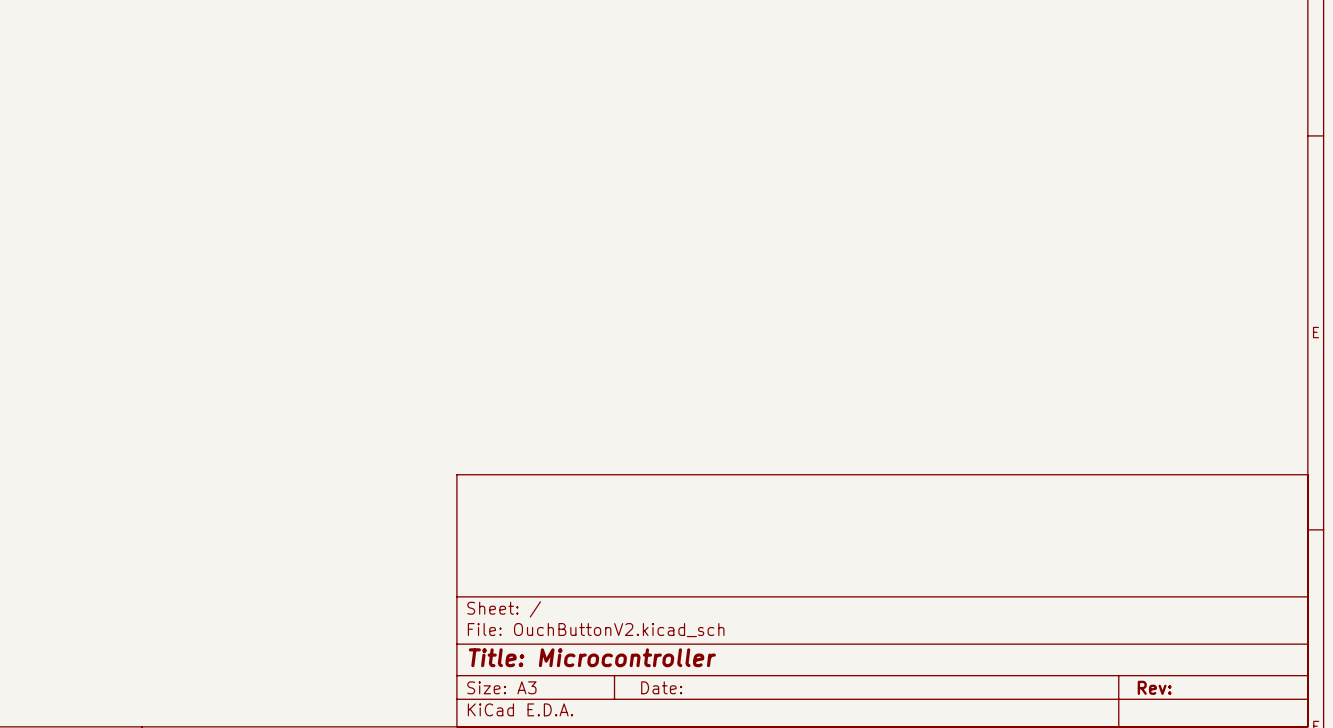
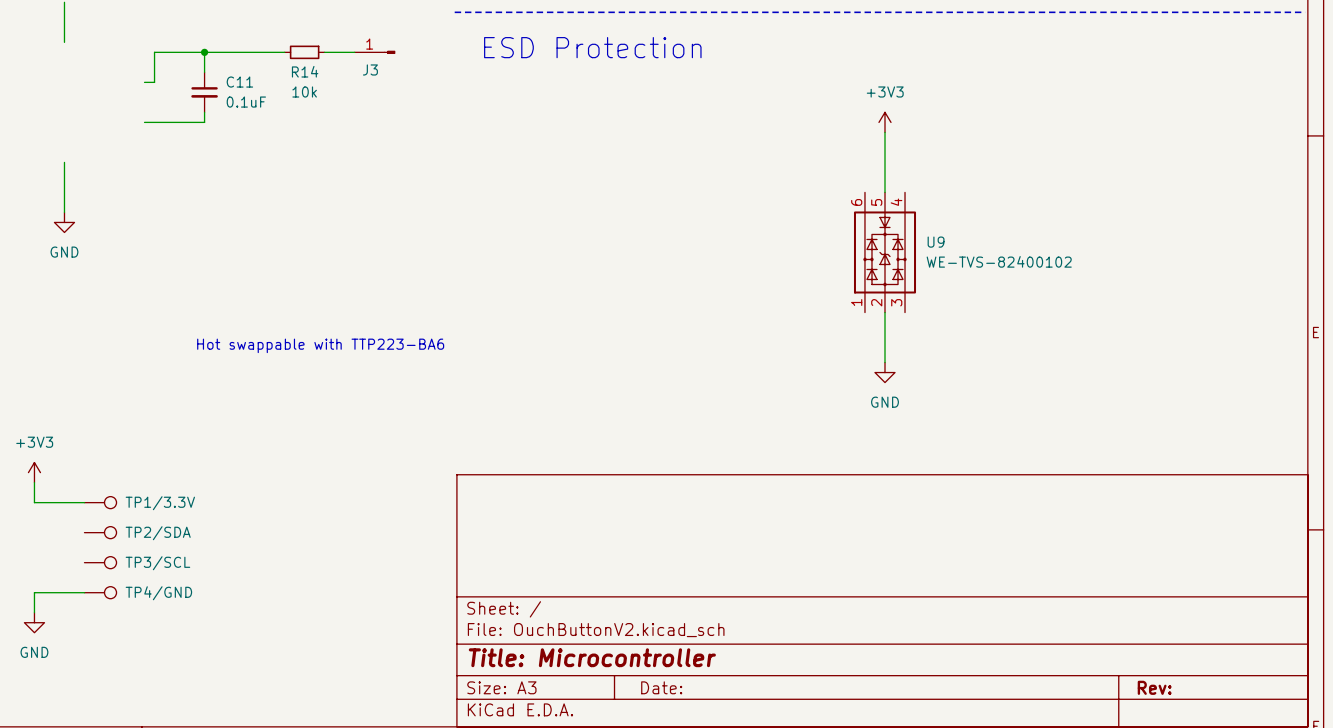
wire: none -> (64, 2) (64, 42)
line: none -> (454, 12) (1305, 12)
text: none -> ESD Protection (592, 47)
wire: none -> (204, 52) (204, 72)
junction: none -> (204, 52)
wire: none -> (284, 52) (154, 52) (154, 82) (144, 82)
R14: none -> 10k (304, 52)
wire: none -> (324, 52) (354, 52)
J3: none -> (374, 52)
C11: none -> 0.1uF (204, 92)
wire: none -> (204, 112) (204, 122) (144, 122)
power symbol: none -> +3V3 (884, 122)
wire: none -> (884, 132) (884, 192)
wire: none -> (64, 162) (64, 212)
power symbol: none -> GND (64, 222)
U9: none -> WE-TVS-82400102 (884, 252)
wire: none -> (884, 312) (884, 362)
text: none -> Hot swappable with TTP223-BA6 (320, 345)
power symbol: none -> GND (884, 372)
power symbol: none -> +3V3 (34, 472)
wire: none -> (34, 482) (34, 502) (84, 502)
TP1/3.3V: none -> (100, 502)
TP2/SDA: none -> (100, 532)
TP3/SCL: none -> (100, 562)
wire: none -> (84, 592) (34, 592) (34, 612)
TP4/GND: none -> (100, 592)
power symbol: none -> GND (34, 622)

